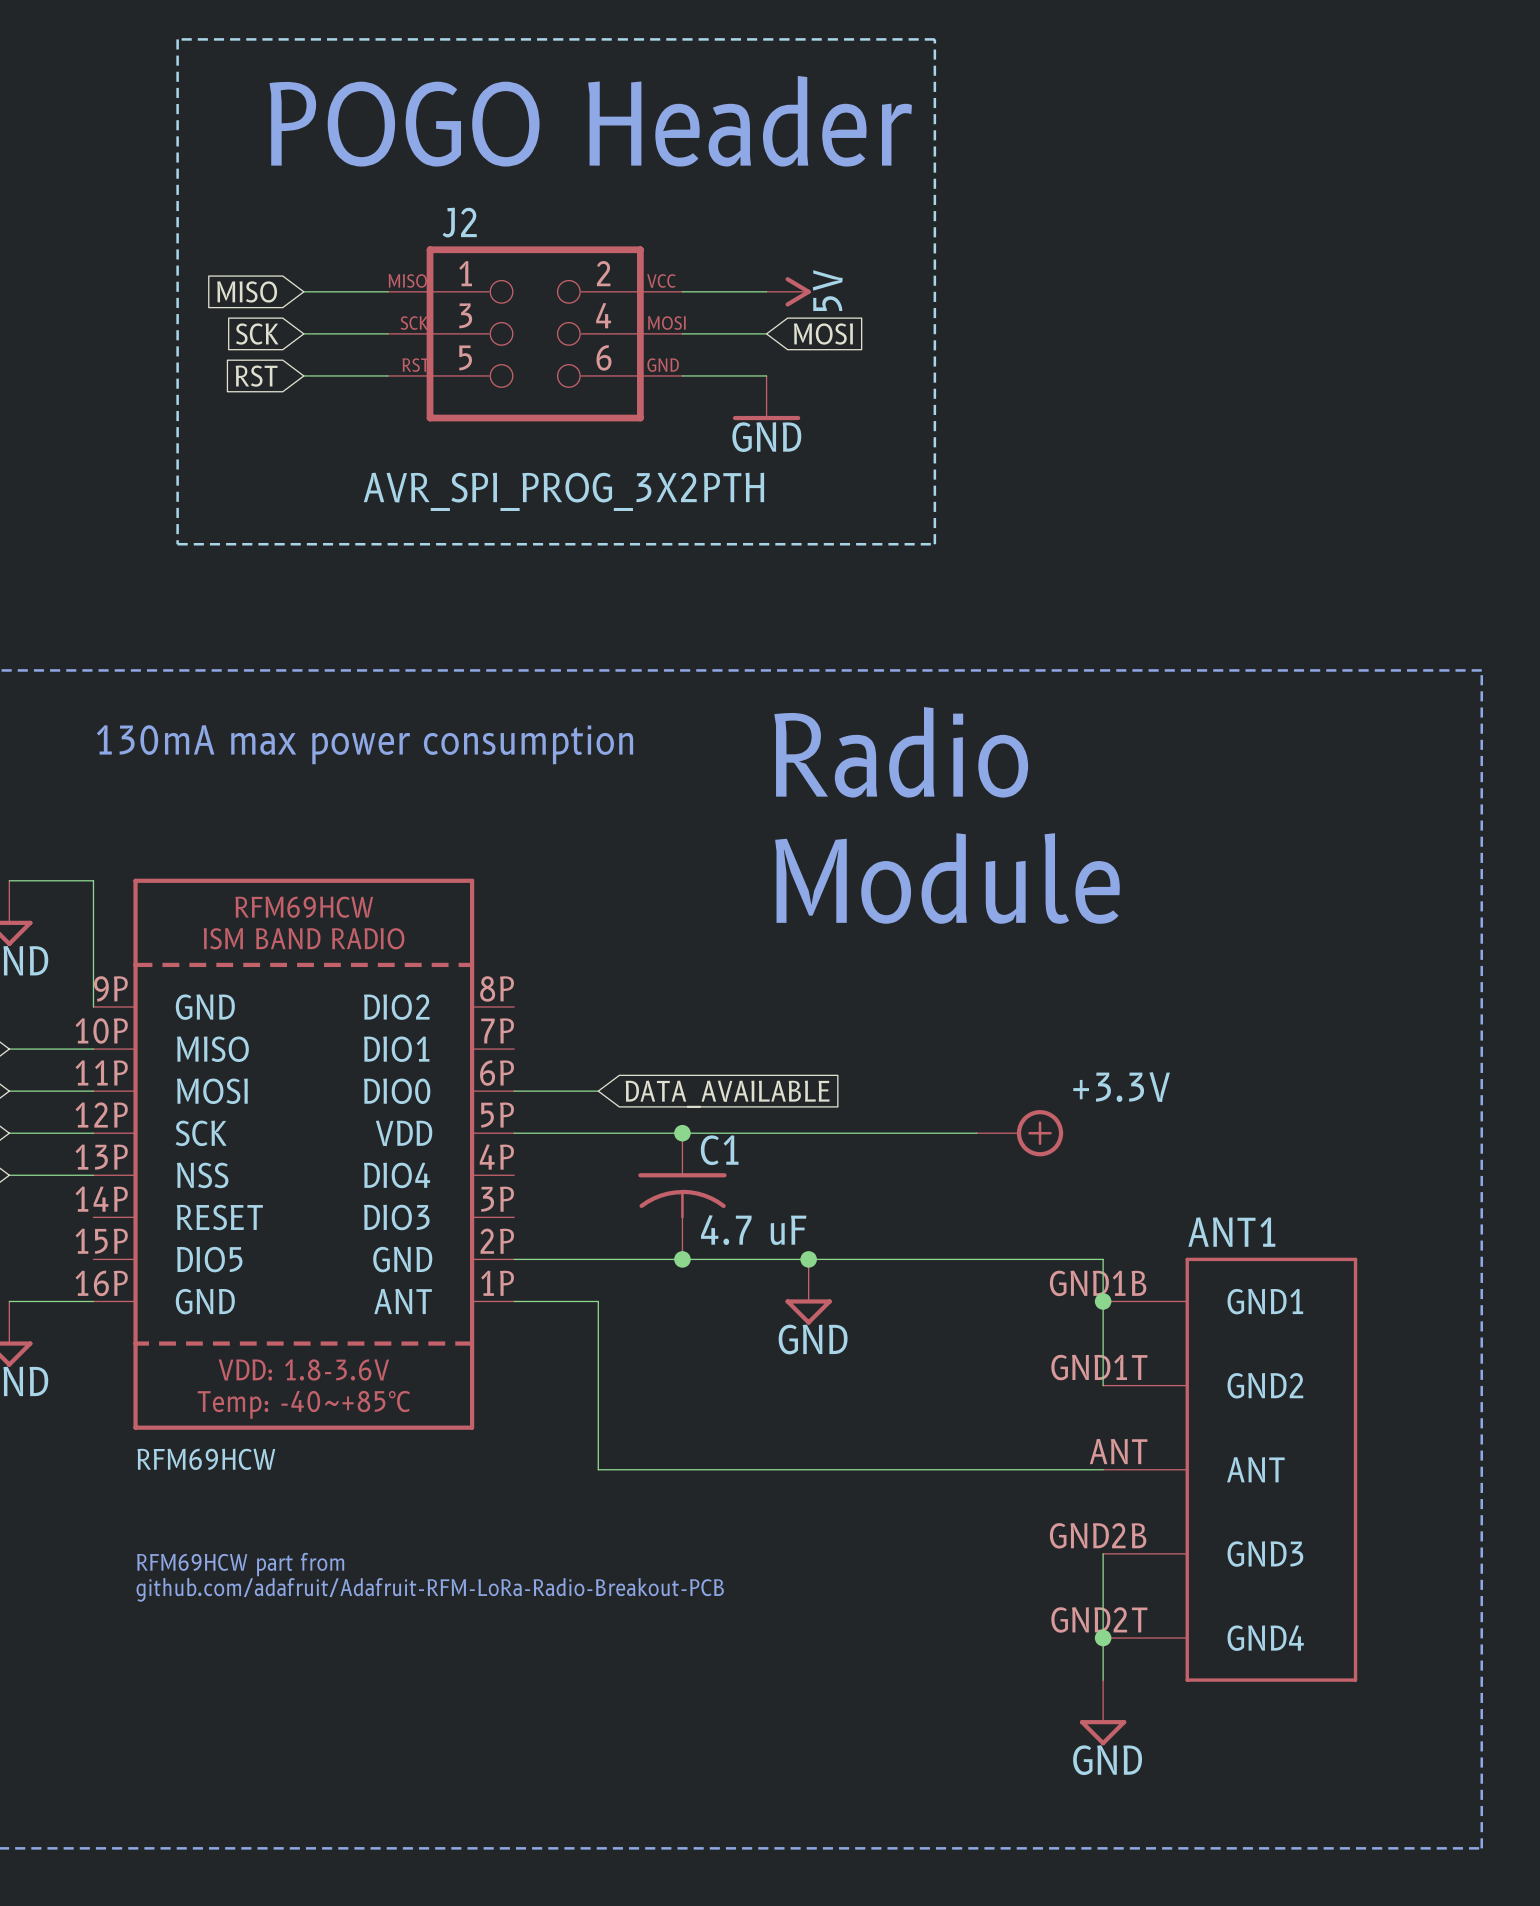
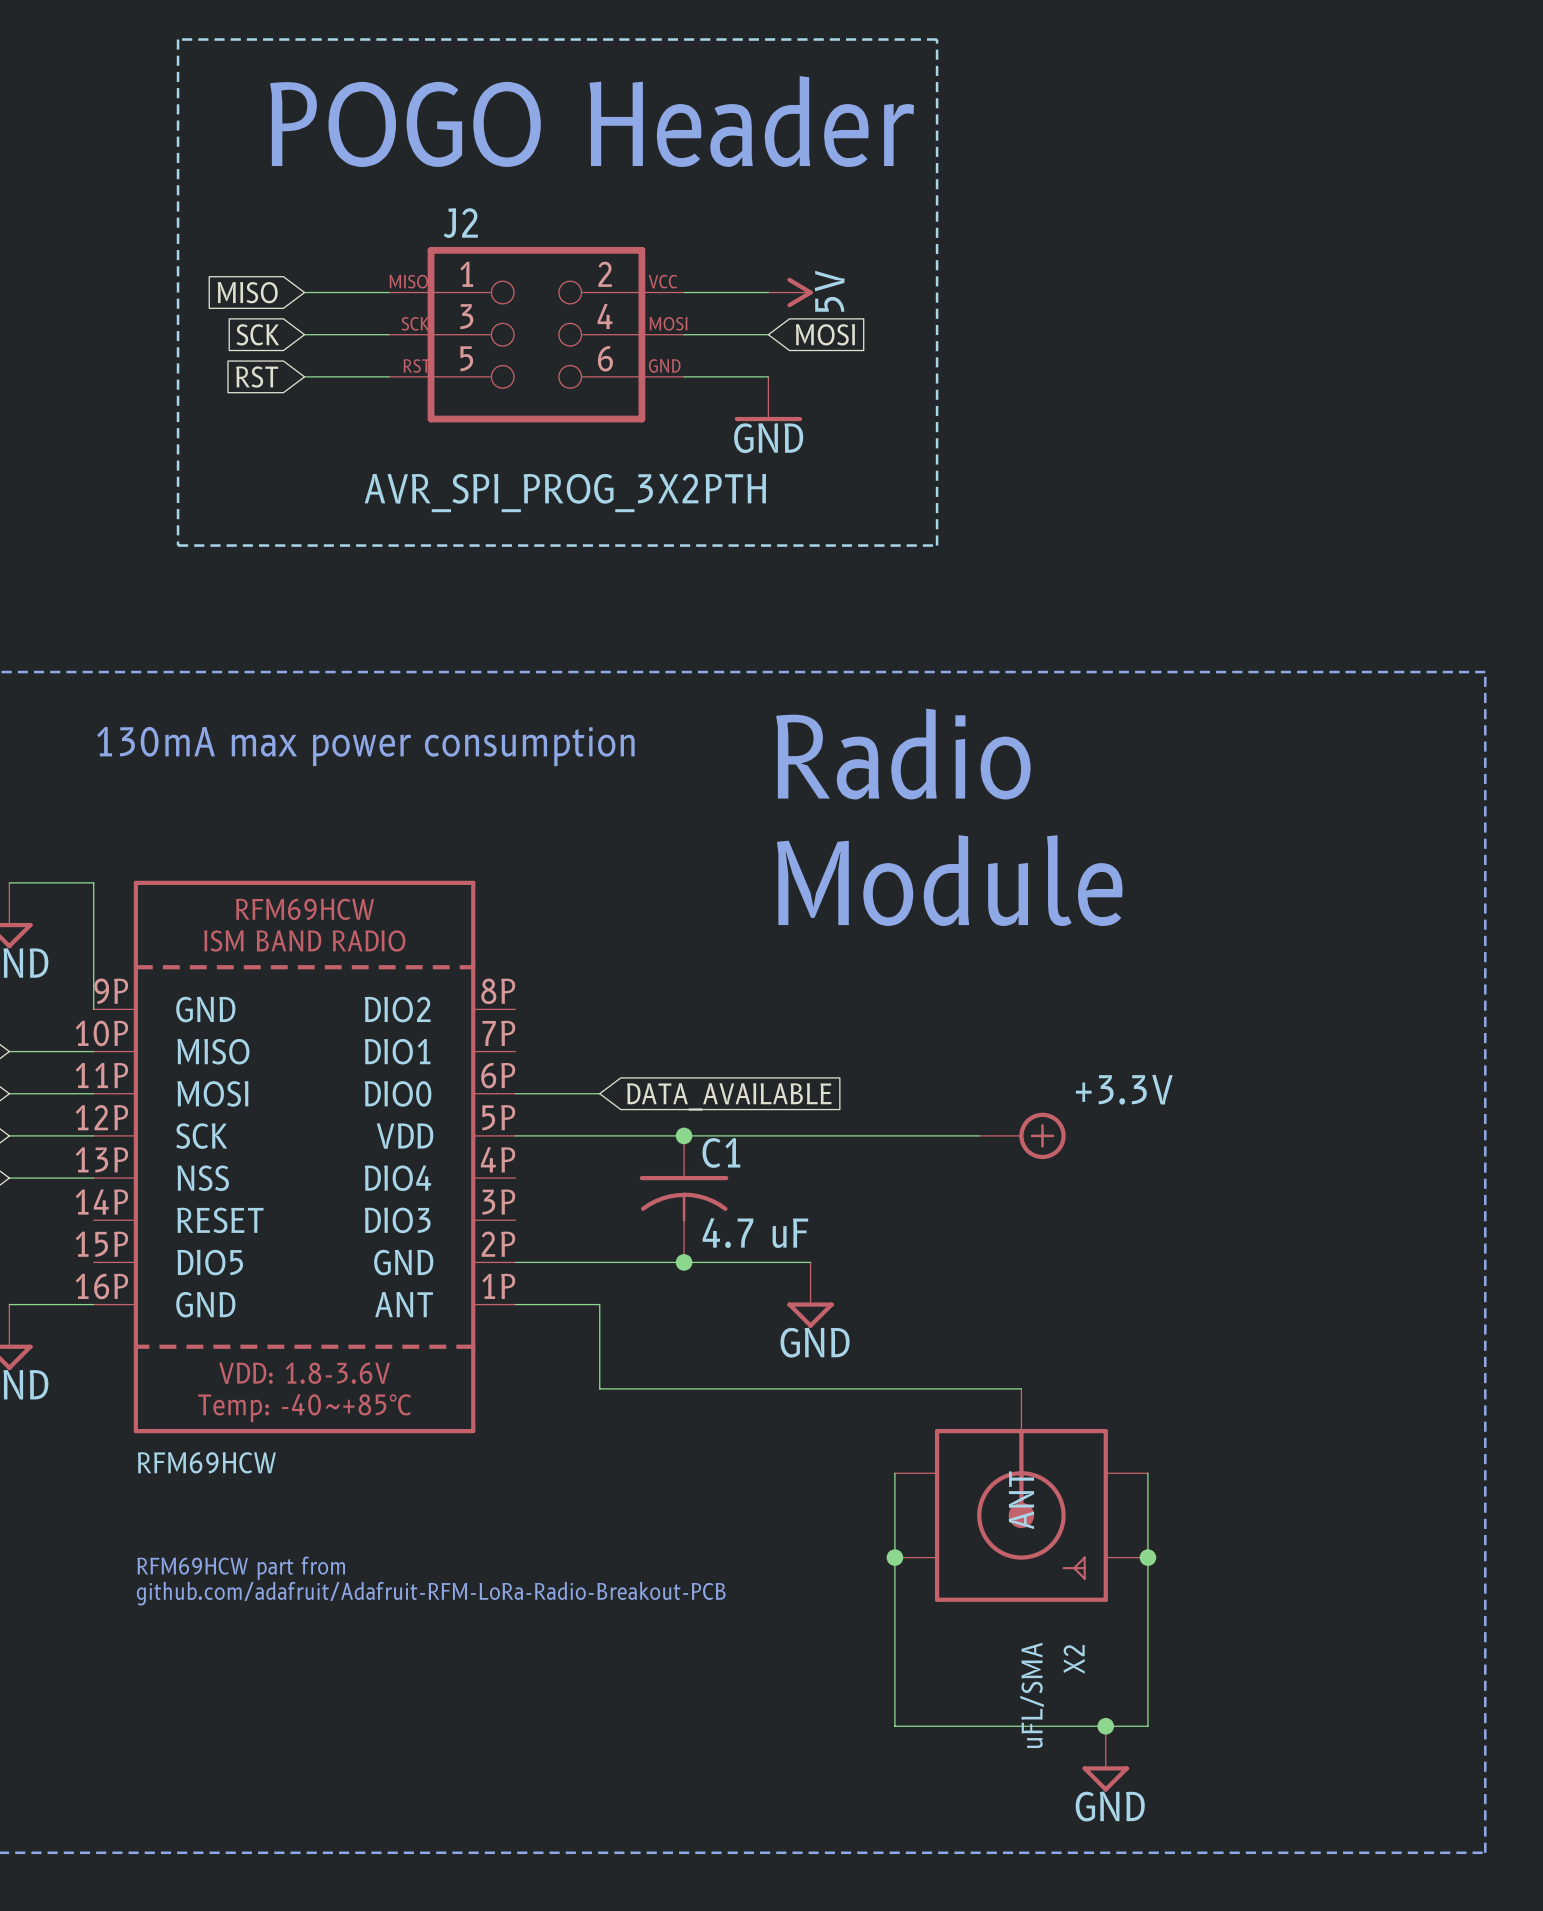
wire: (808, 1259) (1103, 1259) (1103, 1385) -> none
junction: (808, 1259) -> none
junction: (1103, 1301) -> none
wire: (598, 1385) (598, 1469) (1103, 1469) -> (599, 1388) (1021, 1388)
wire: none -> (894, 1473) (894, 1726) (1147, 1726) (1147, 1473)
ANT1: (1230, 1469) -> none
X2: none -> uFL/SMA (1021, 1495)
junction: none -> (894, 1557)
wire: (1103, 1553) (1103, 1680) -> none
junction: none -> (1147, 1557)
junction: (1103, 1638) -> none
power symbol position: GND (1103, 1712) -> GND (1105, 1758)
junction: none -> (1105, 1726)

